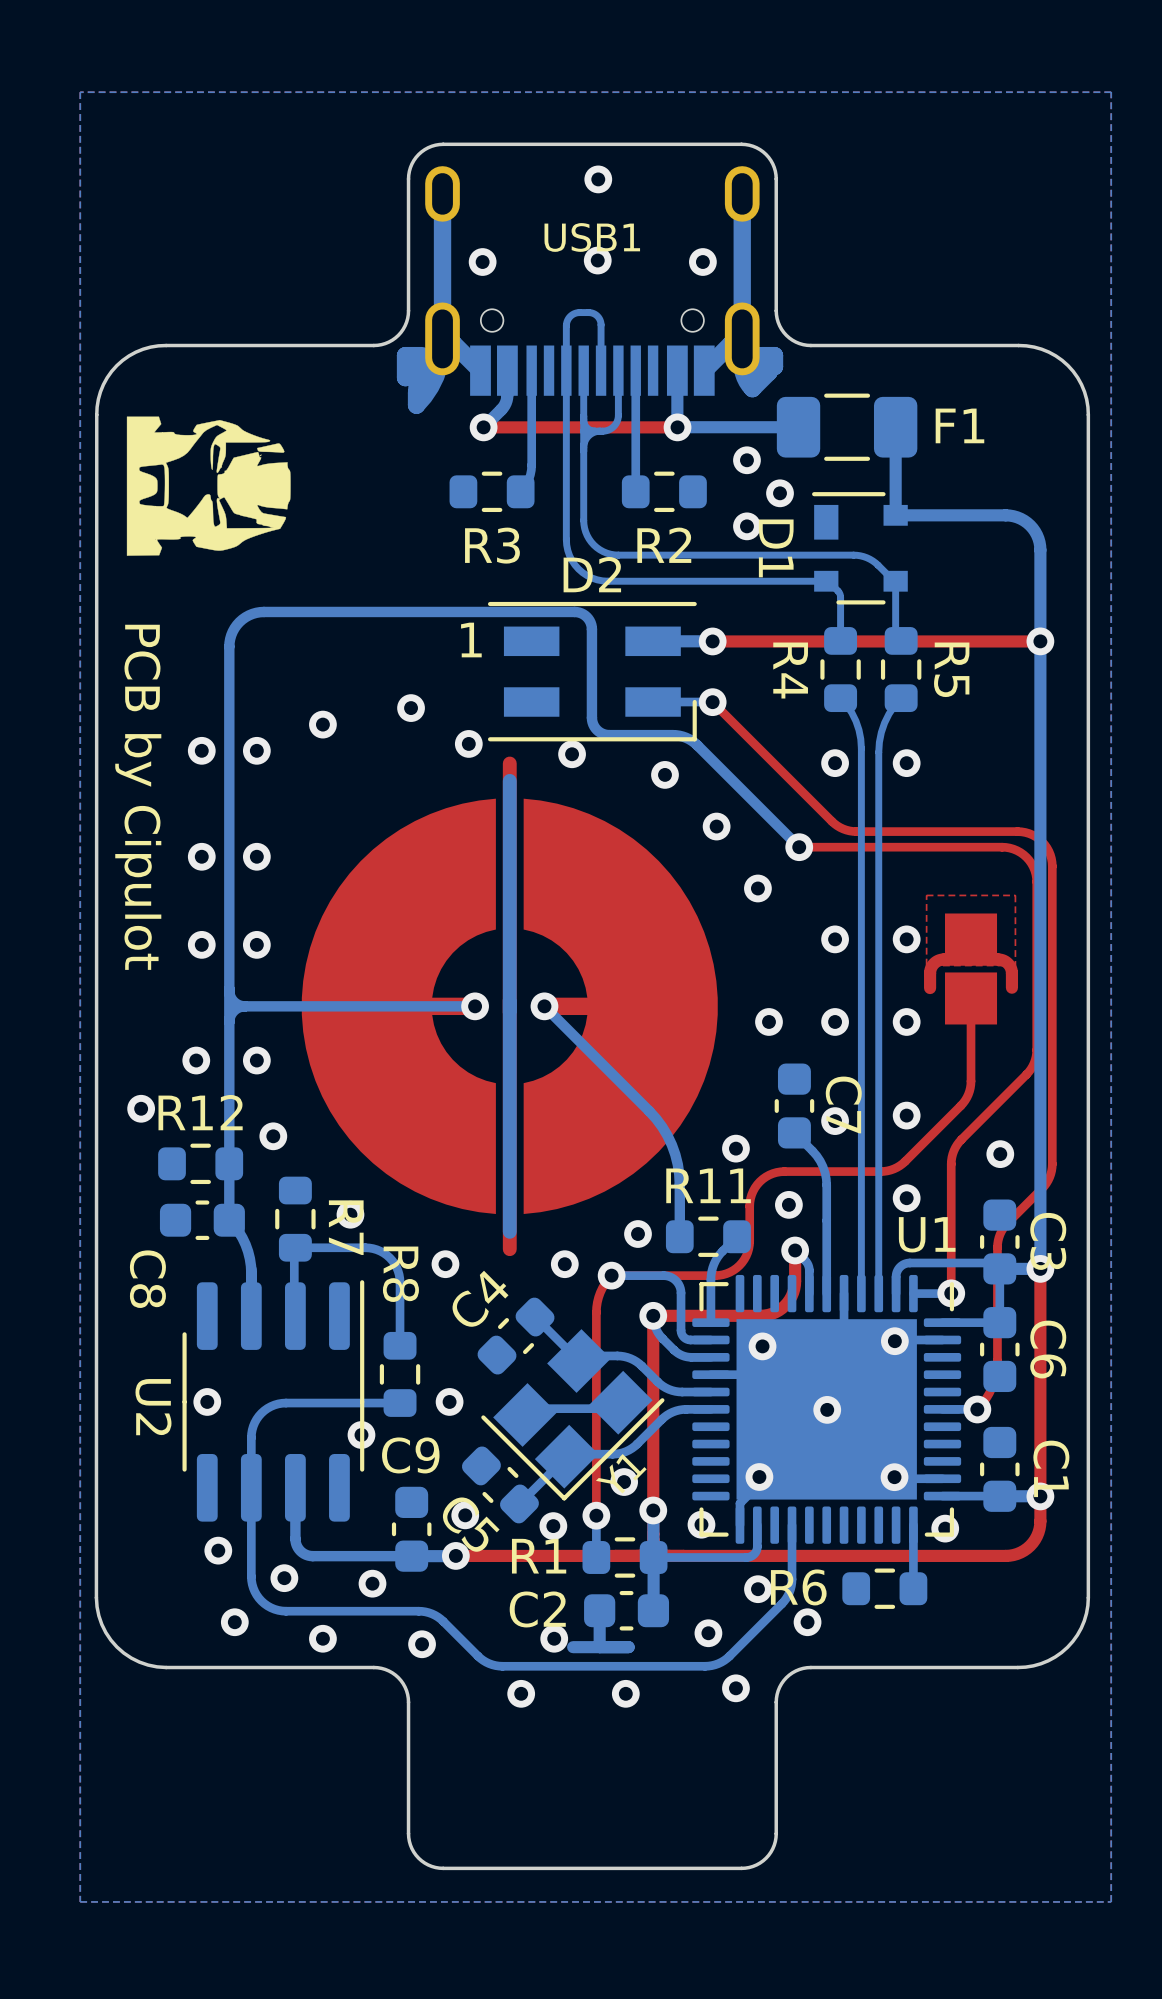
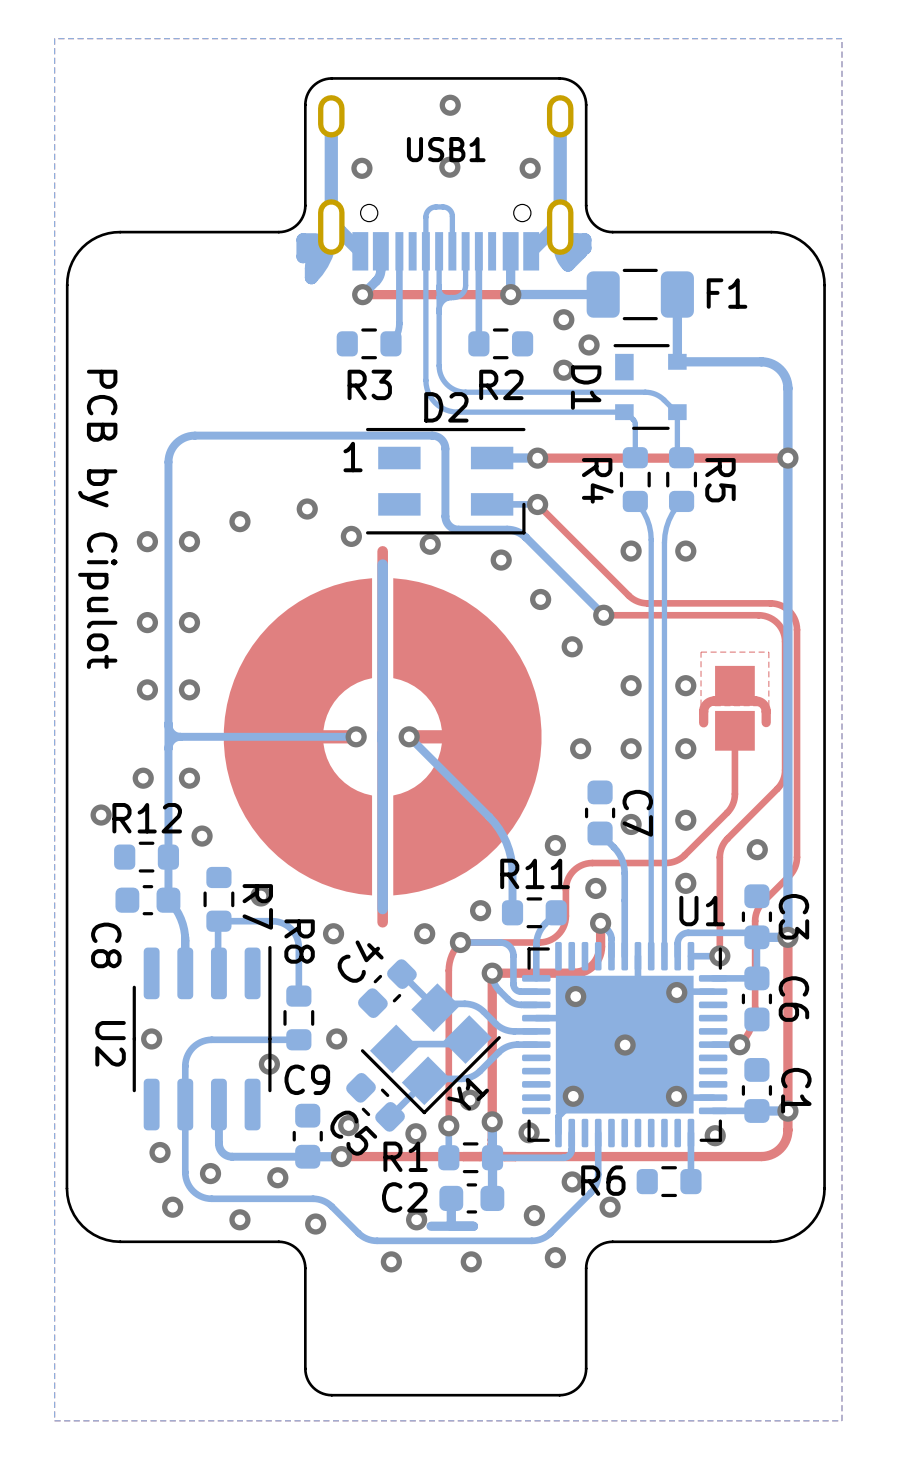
drawing: [126, 416, 291, 556] -> none
text position: PCB by Cipulot (138, 797) -> PCB by Cipulot (97, 519)

